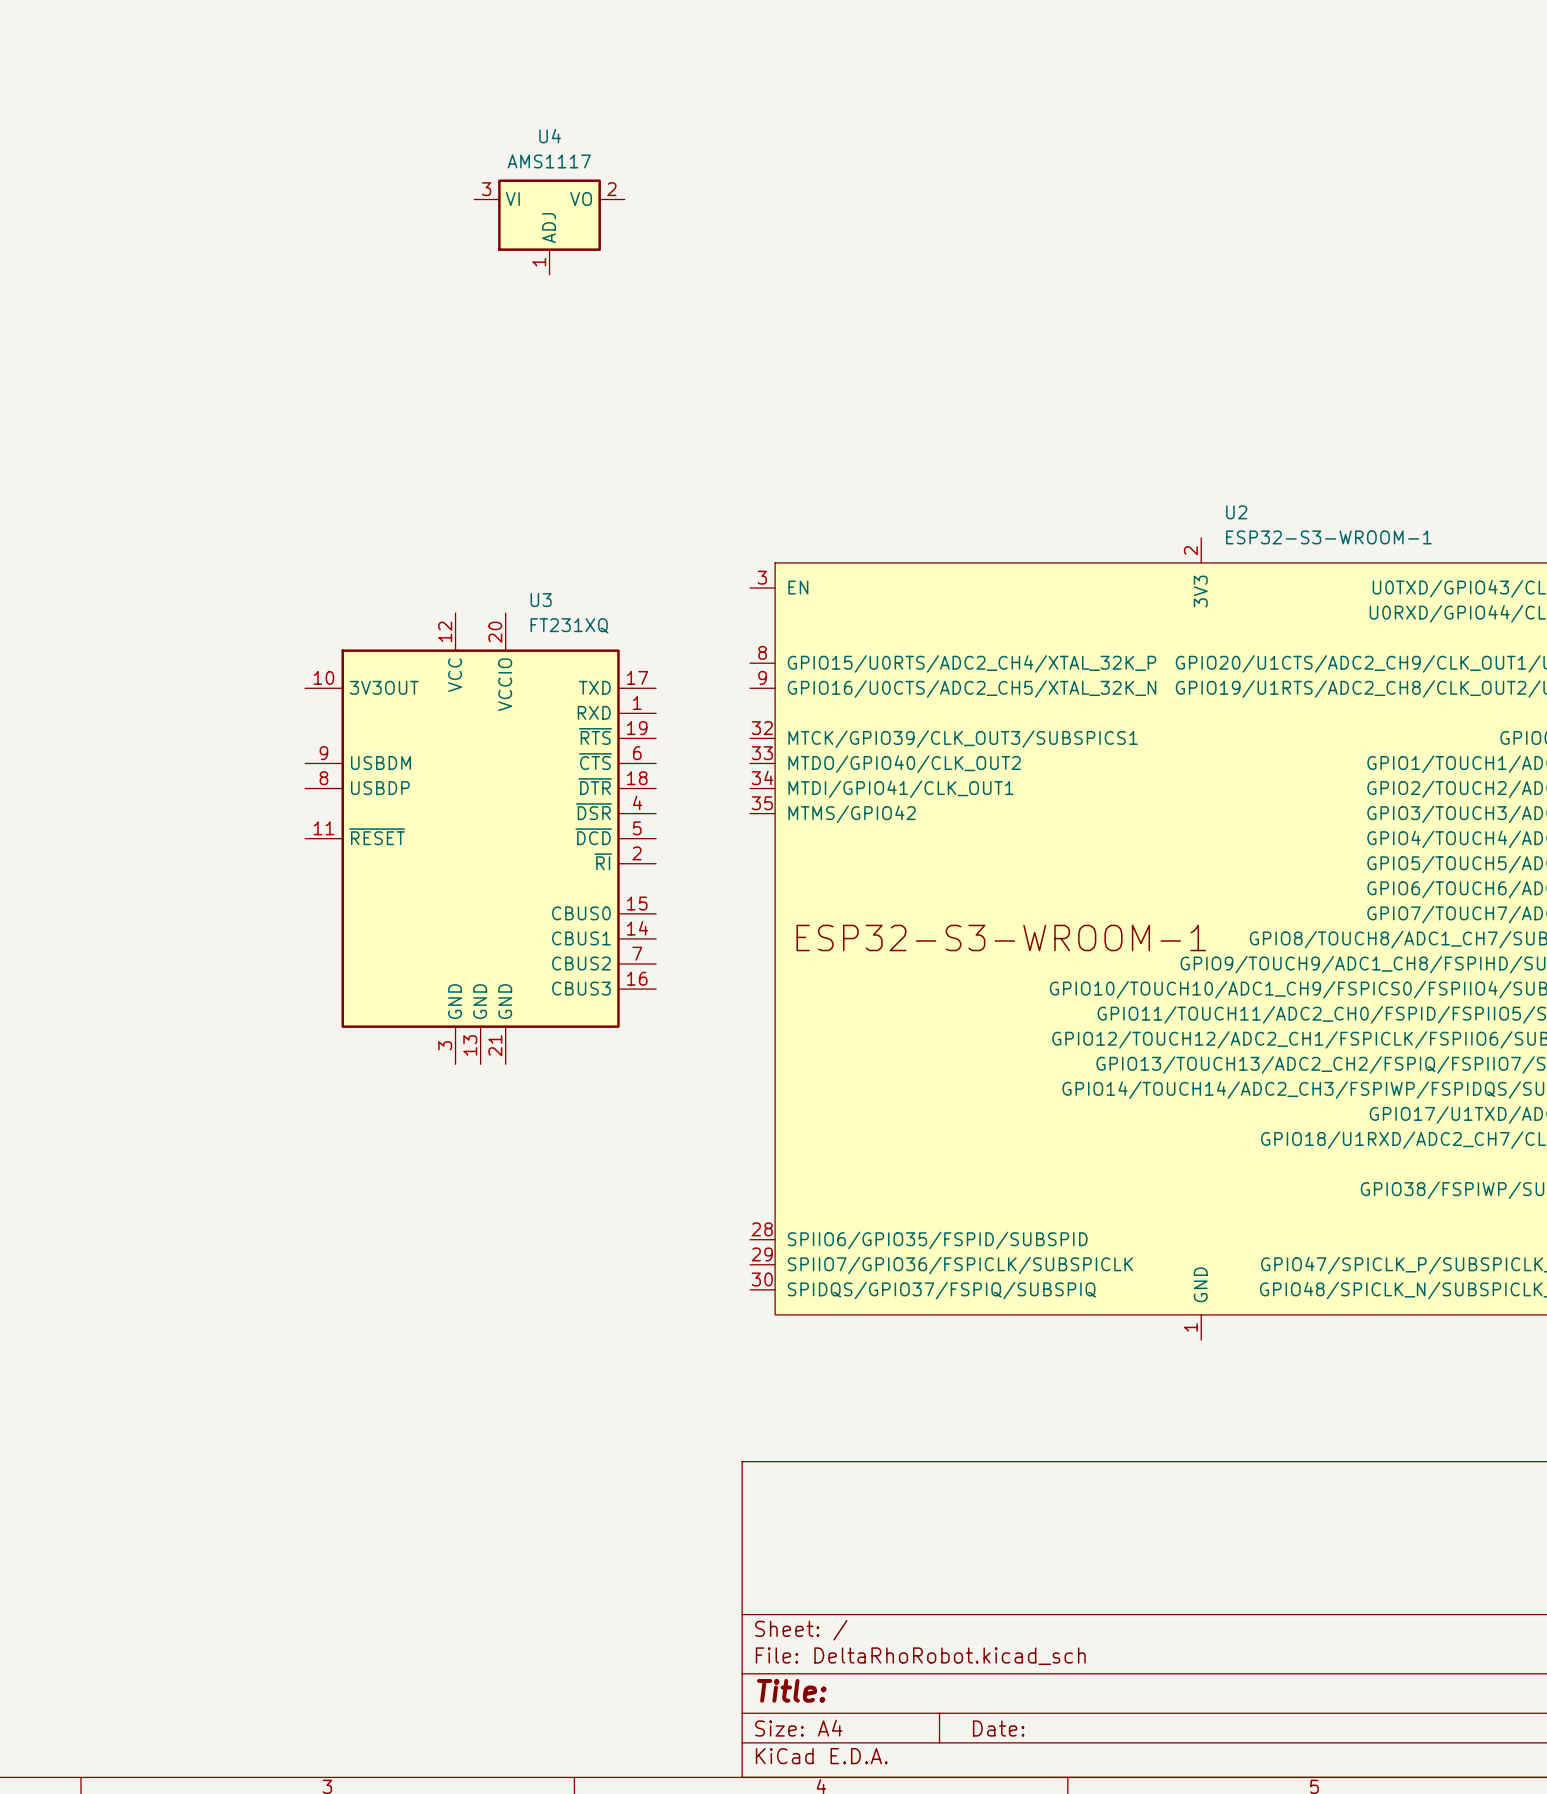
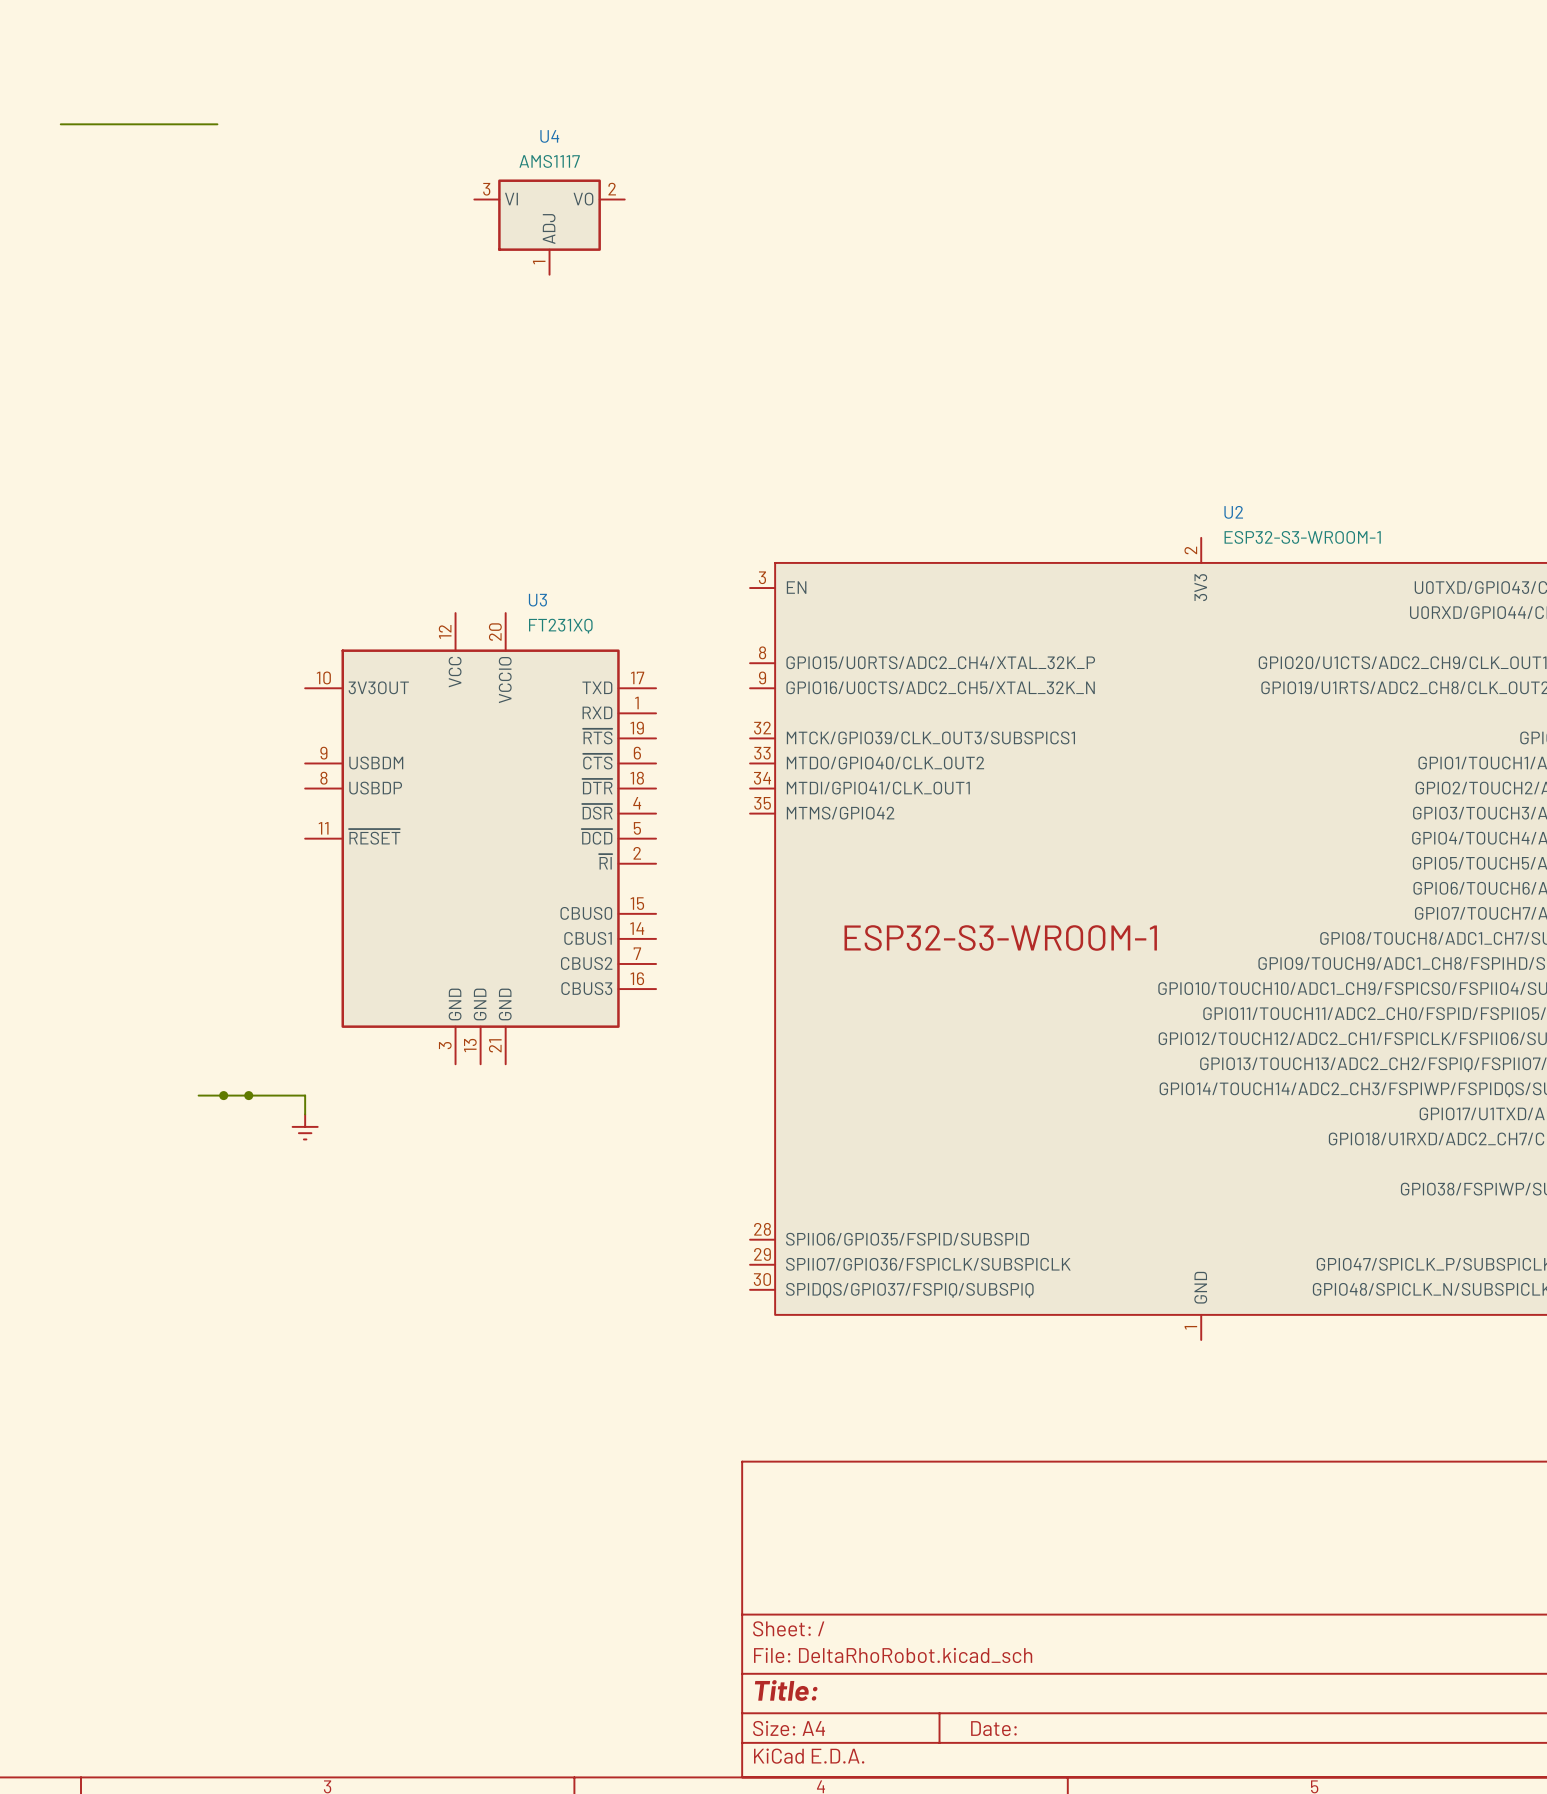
wire: none -> (60, 124) (217, 124)
wire: none -> (198, 1095) (305, 1095) (305, 1114)
junction: none -> (223, 1095)
junction: none -> (248, 1095)
power symbol: none -> (305, 1126)

